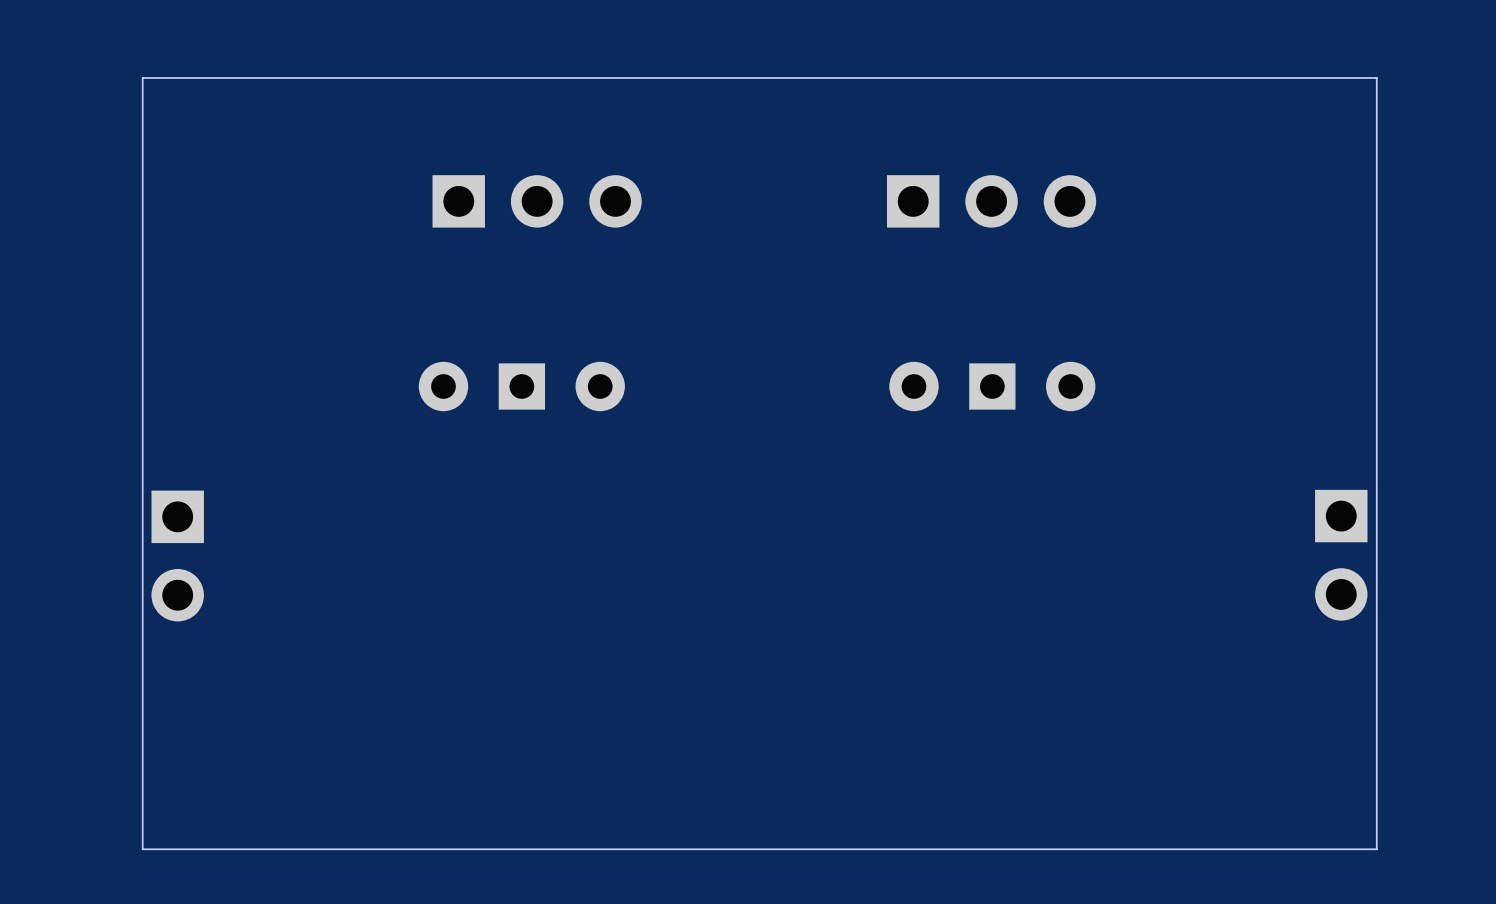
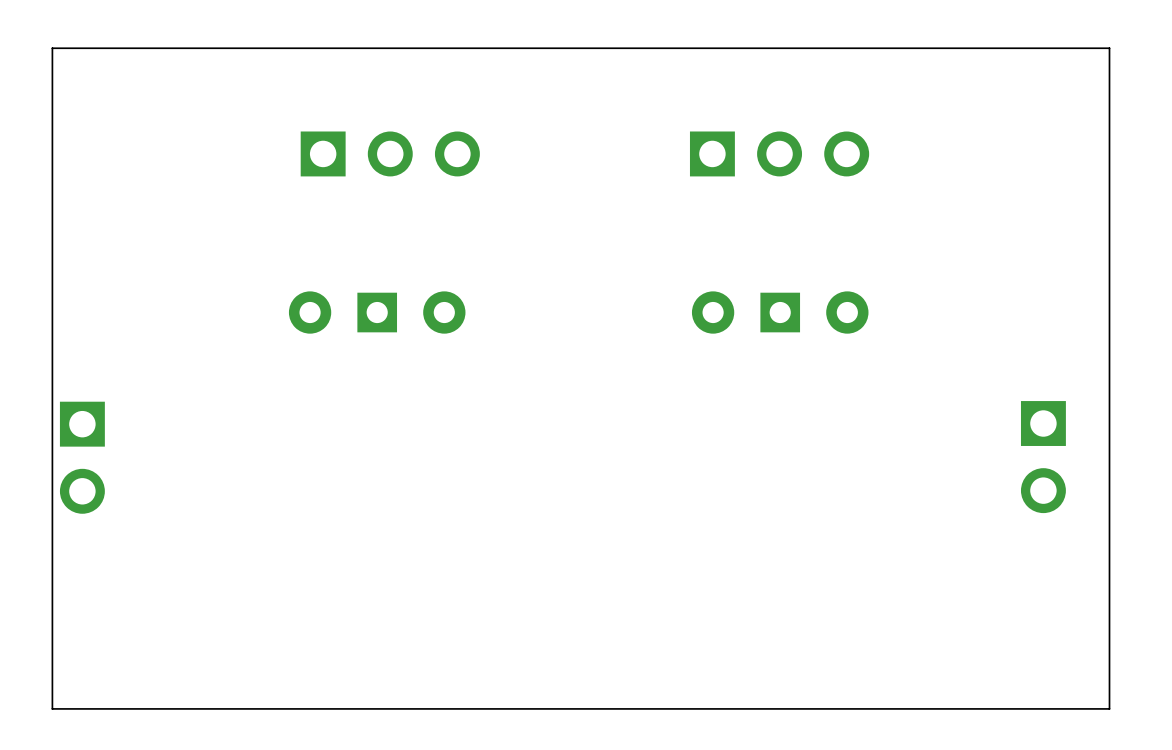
part position: (1341, 555) -> (1043, 457)

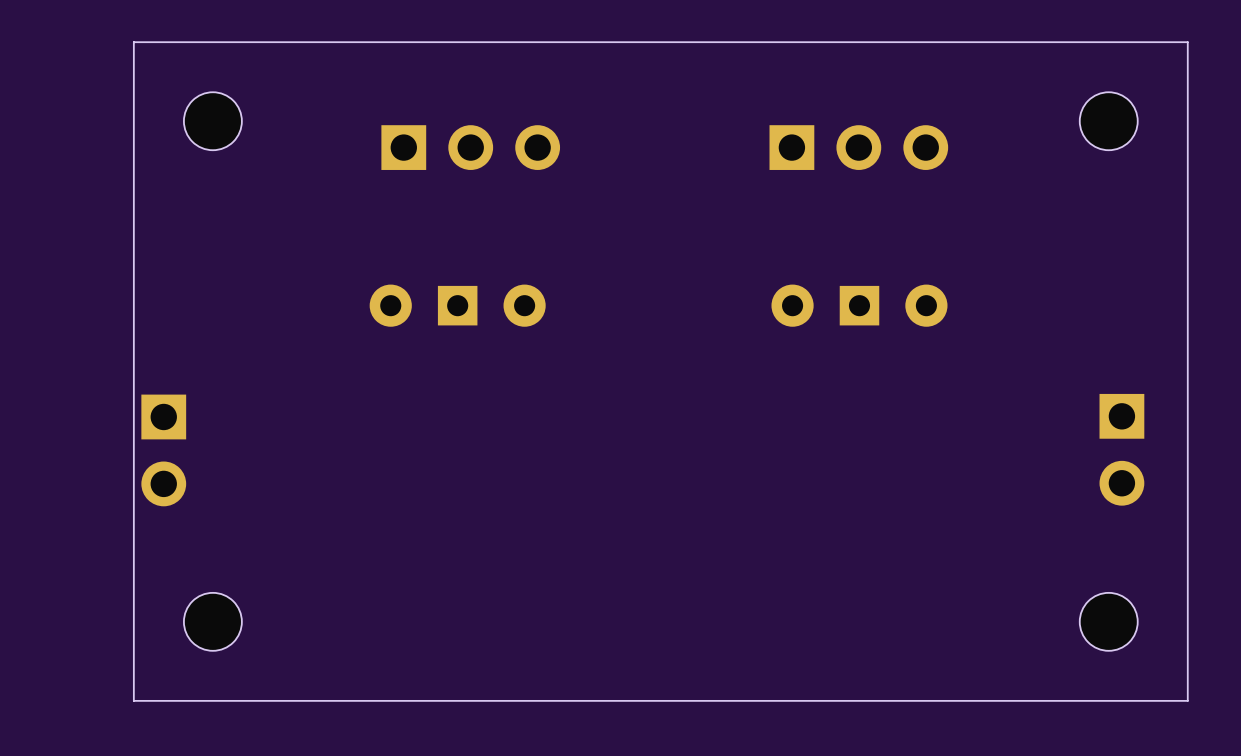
part: none -> (212, 121)
part: none -> (1108, 121)
part: none -> (212, 621)
part: none -> (1108, 621)

